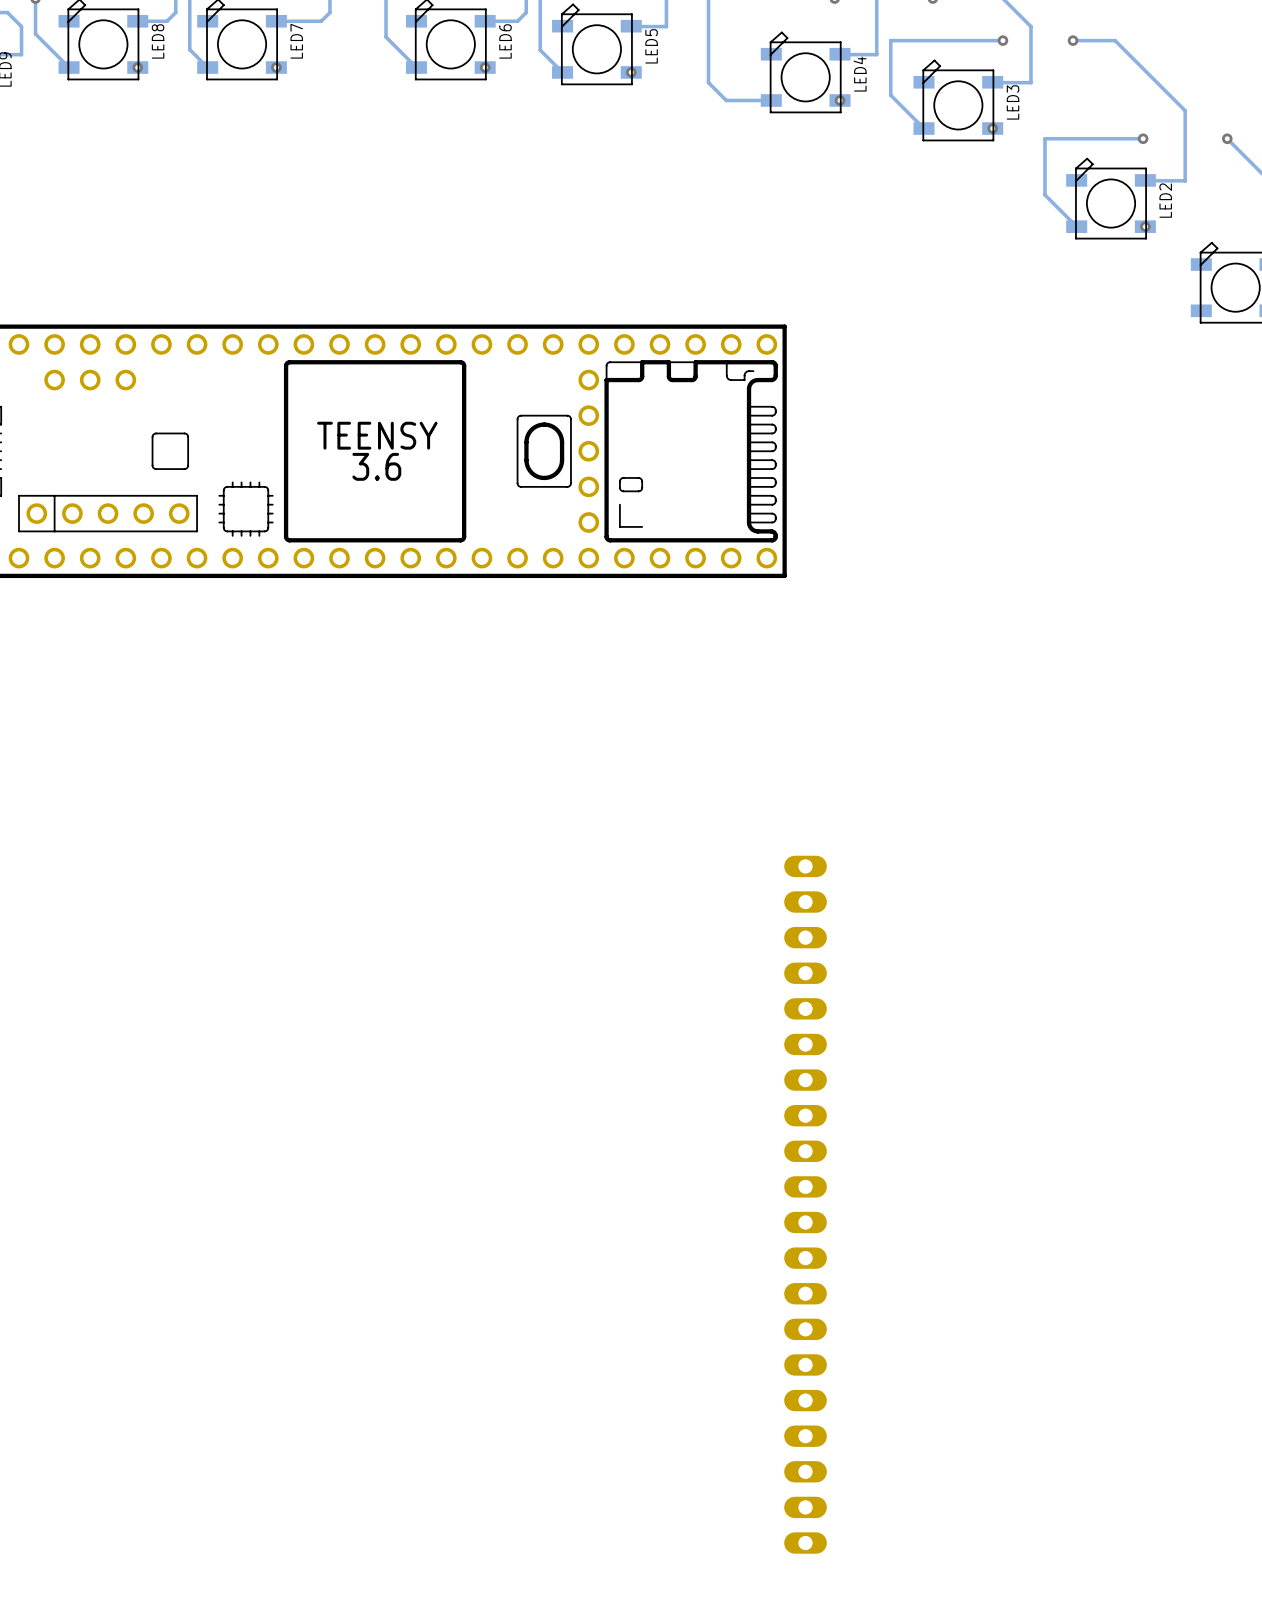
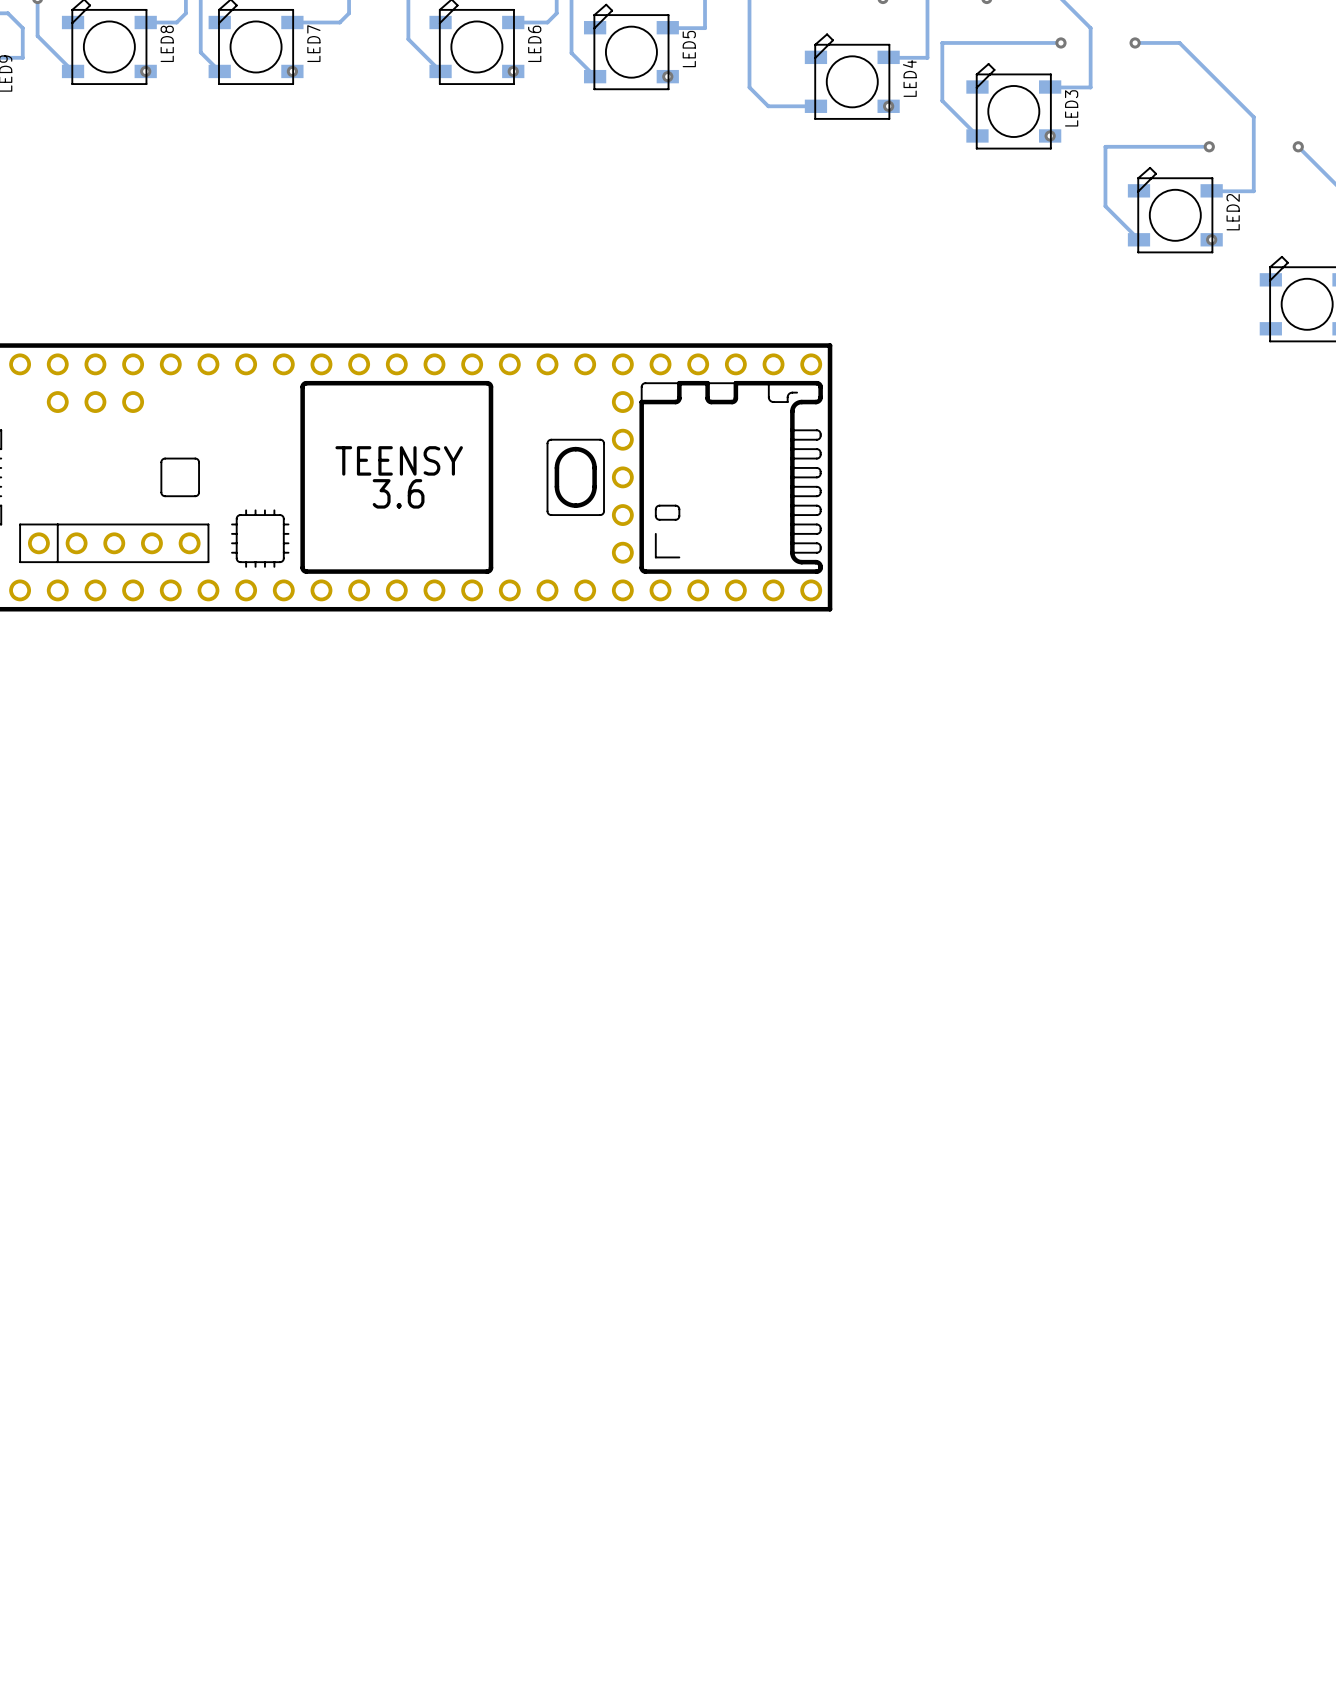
part: (805, 1204) -> none

